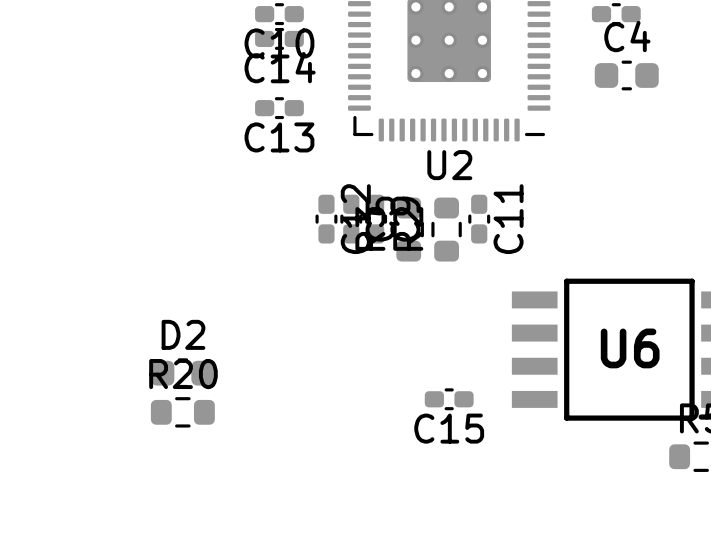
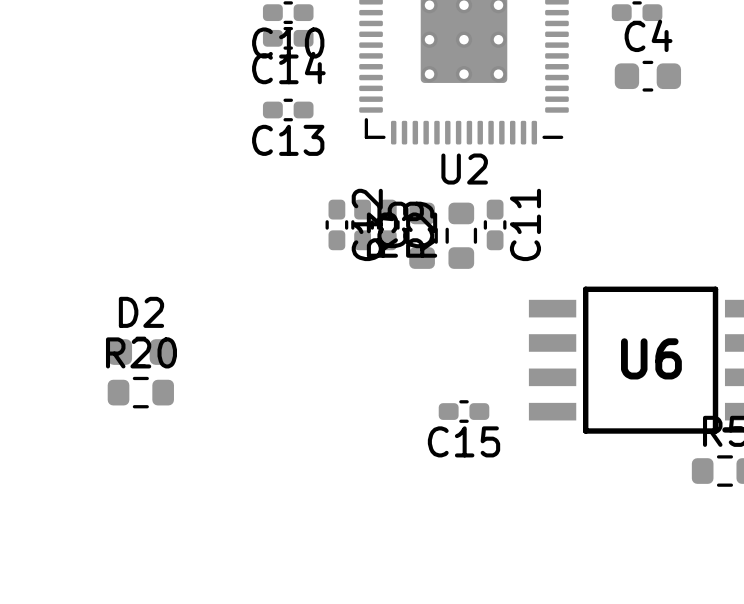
D2 position: (182, 373) -> (140, 352)
R20 position: (182, 412) -> (140, 392)

